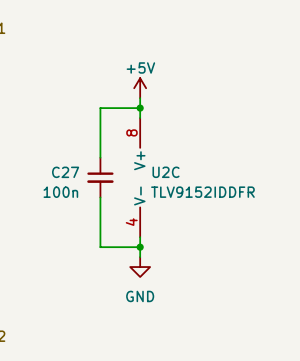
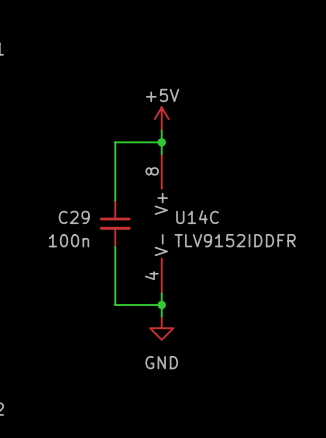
C27 name: C27 (65, 172) -> C29 (74, 217)
U2C name: U2C (166, 172) -> U14C (197, 217)

